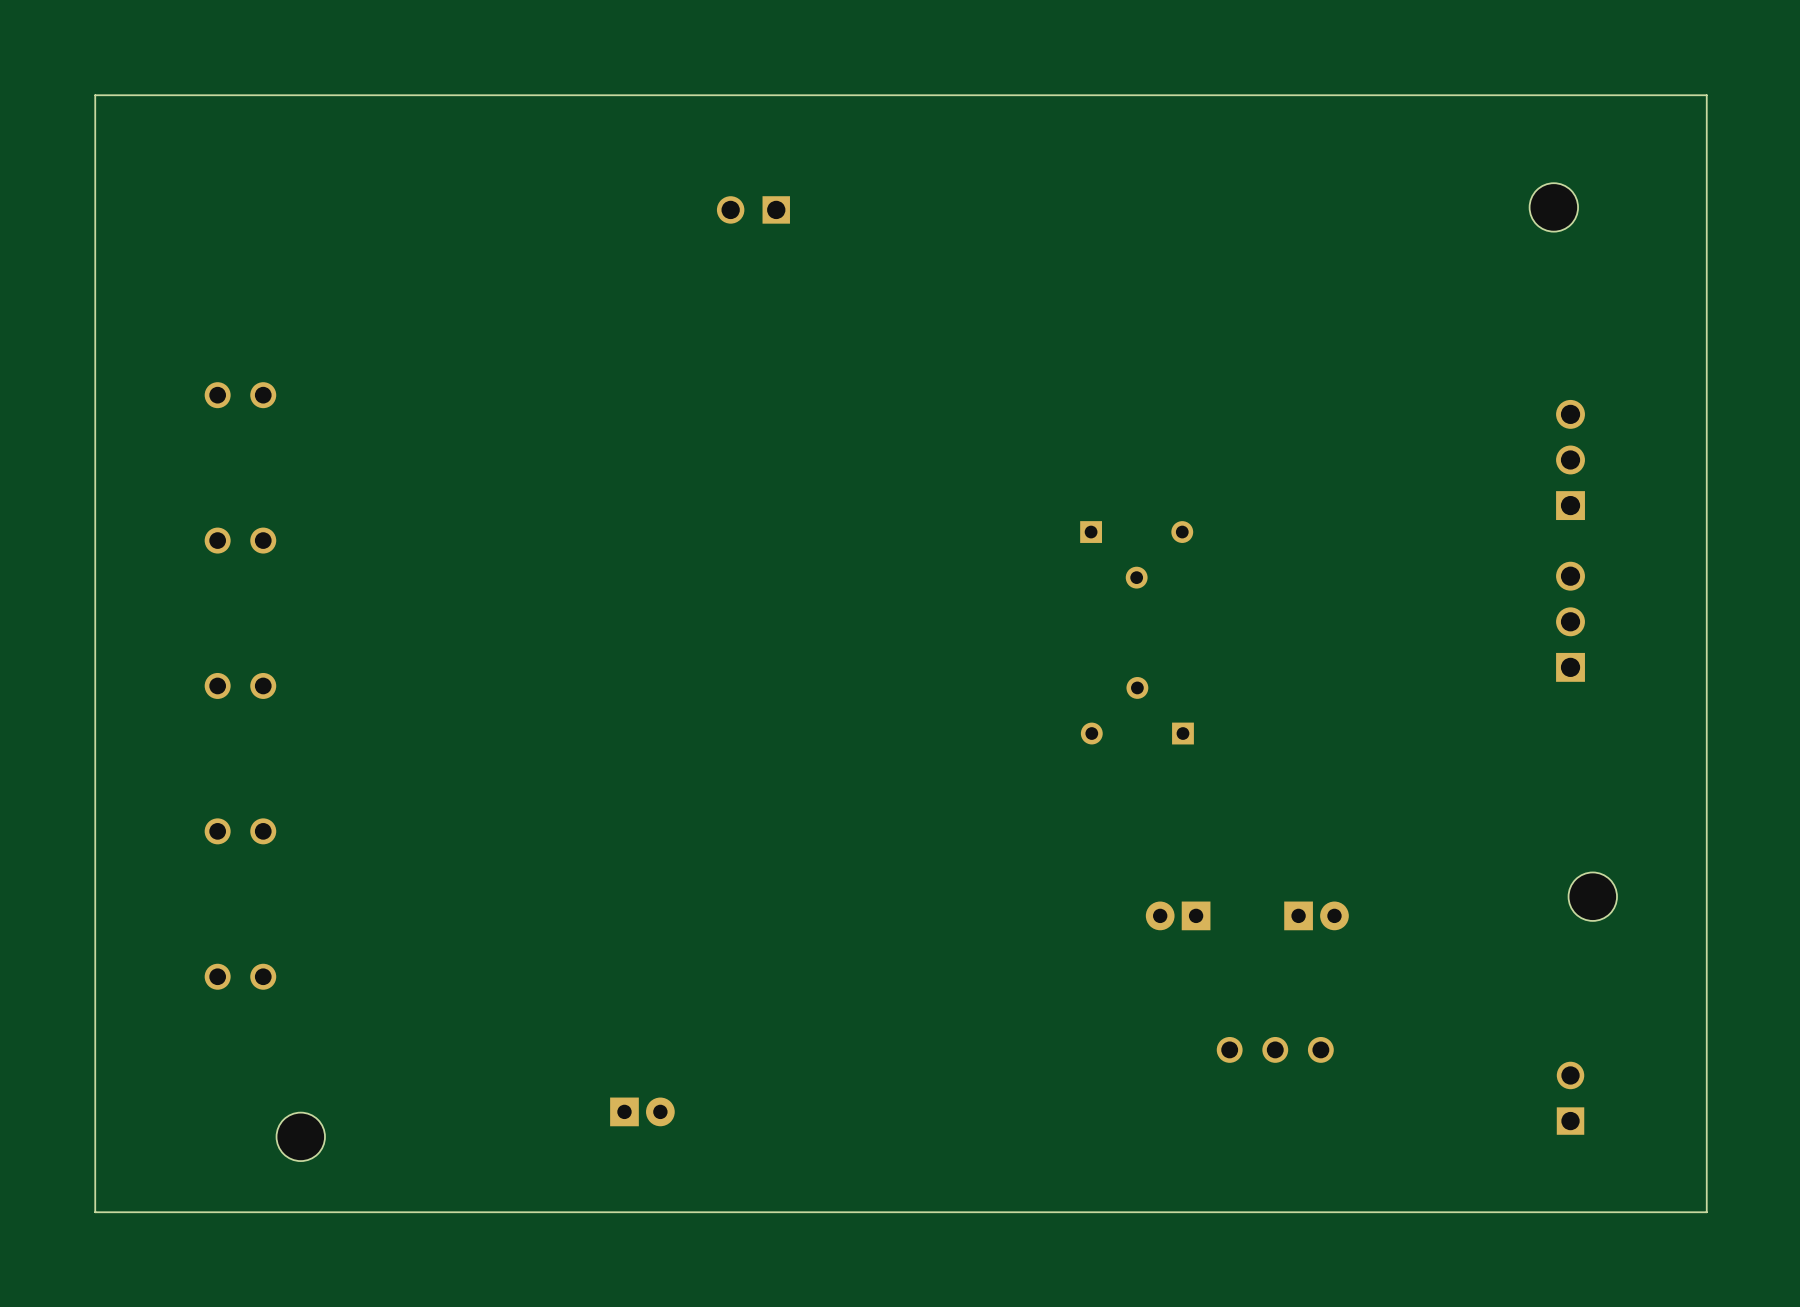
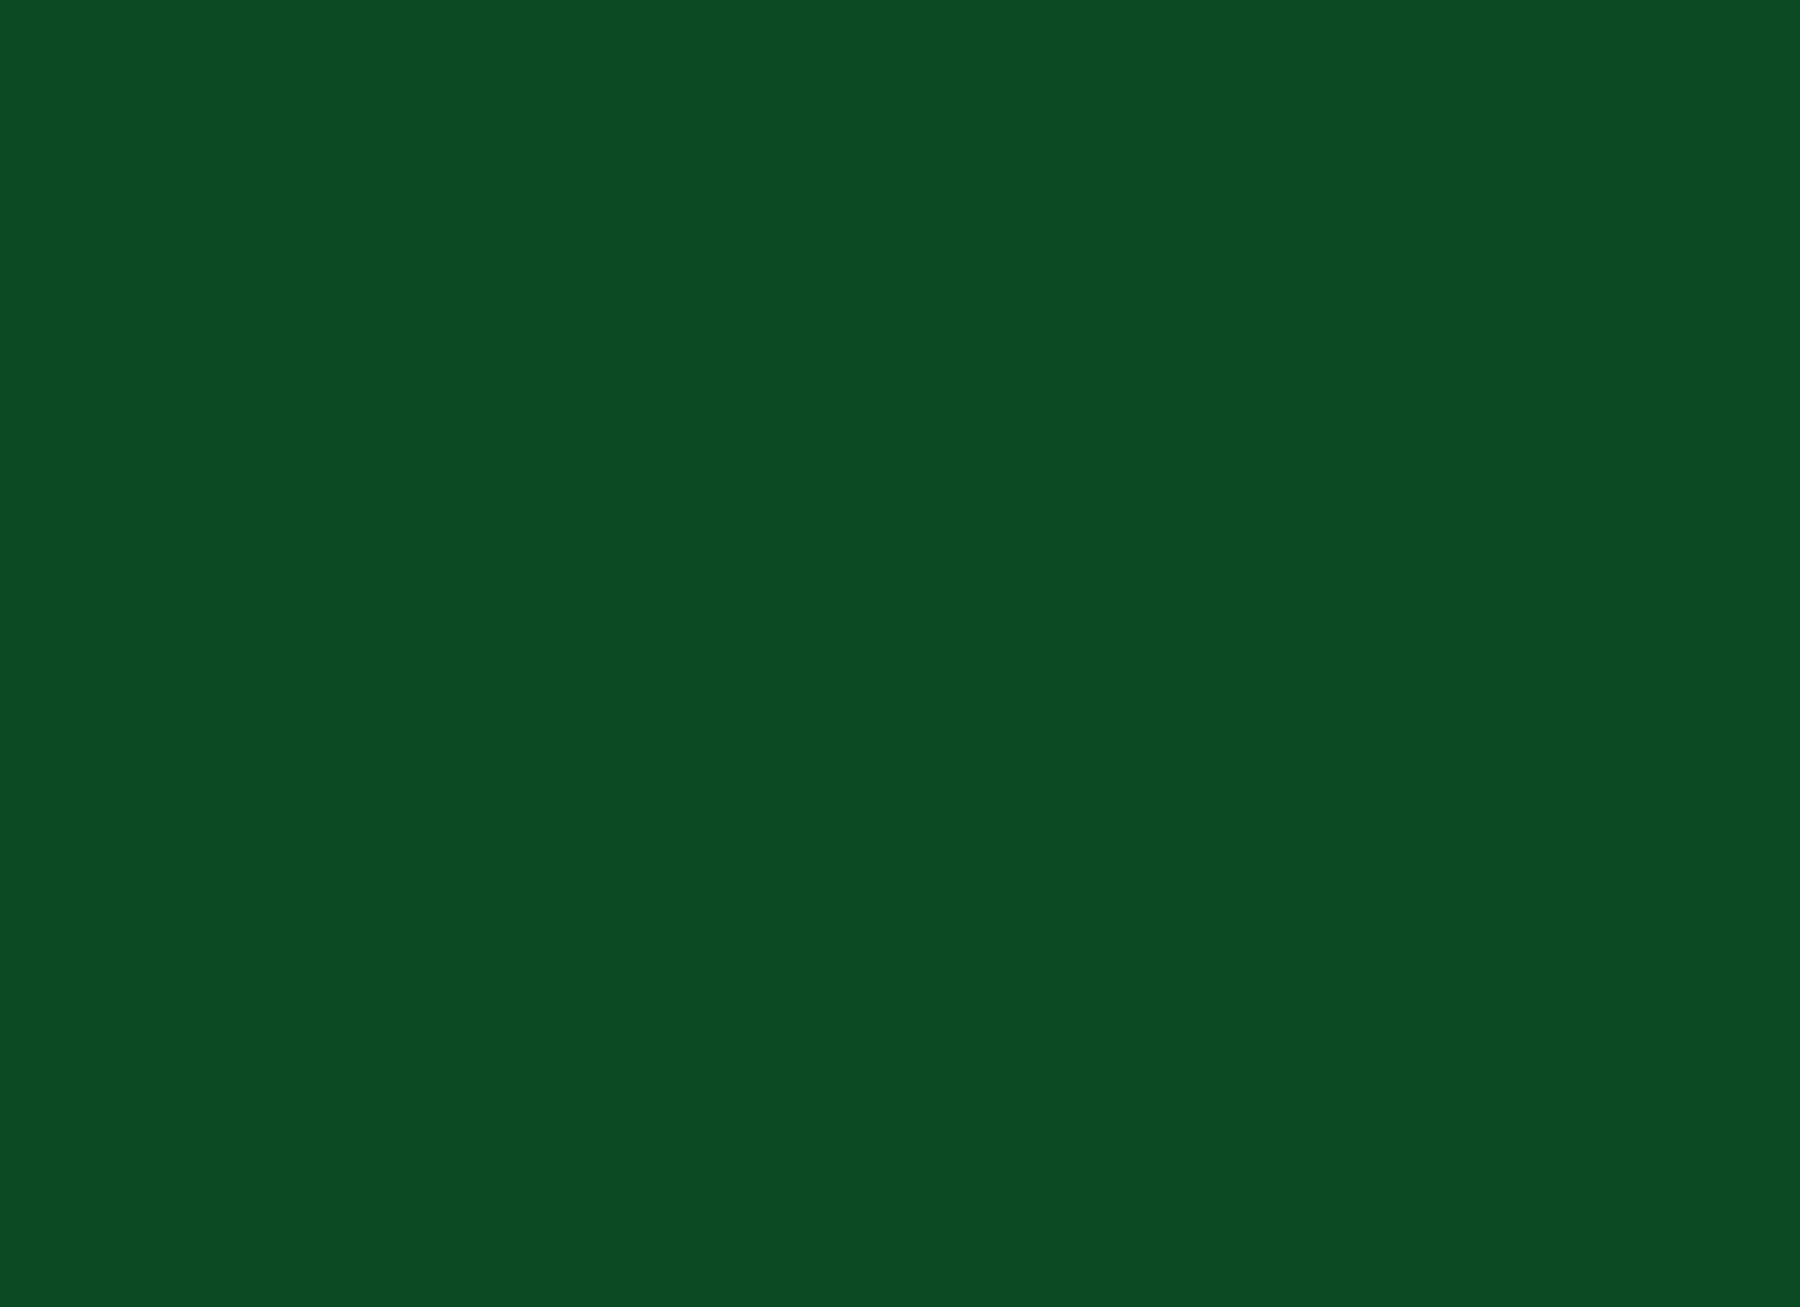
board edge: (1706, 95) (95, 95) (95, 1212) (1706, 1212) (1706, 95) -> none
part: (1553, 207) -> none
part: (753, 209) -> none
part: (240, 395) -> none
part: (1570, 459) -> none
part: (240, 540) -> none
part: (1136, 554) -> none
part: (1570, 621) -> none
part: (240, 685) -> none
part: (1137, 710) -> none
part: (240, 831) -> none
part: (1592, 896) -> none
part: (1178, 915) -> none
part: (1316, 915) -> none
part: (240, 976) -> none
part: (1275, 1049) -> none
part: (1570, 1098) -> none
part: (642, 1111) -> none
part: (300, 1136) -> none

